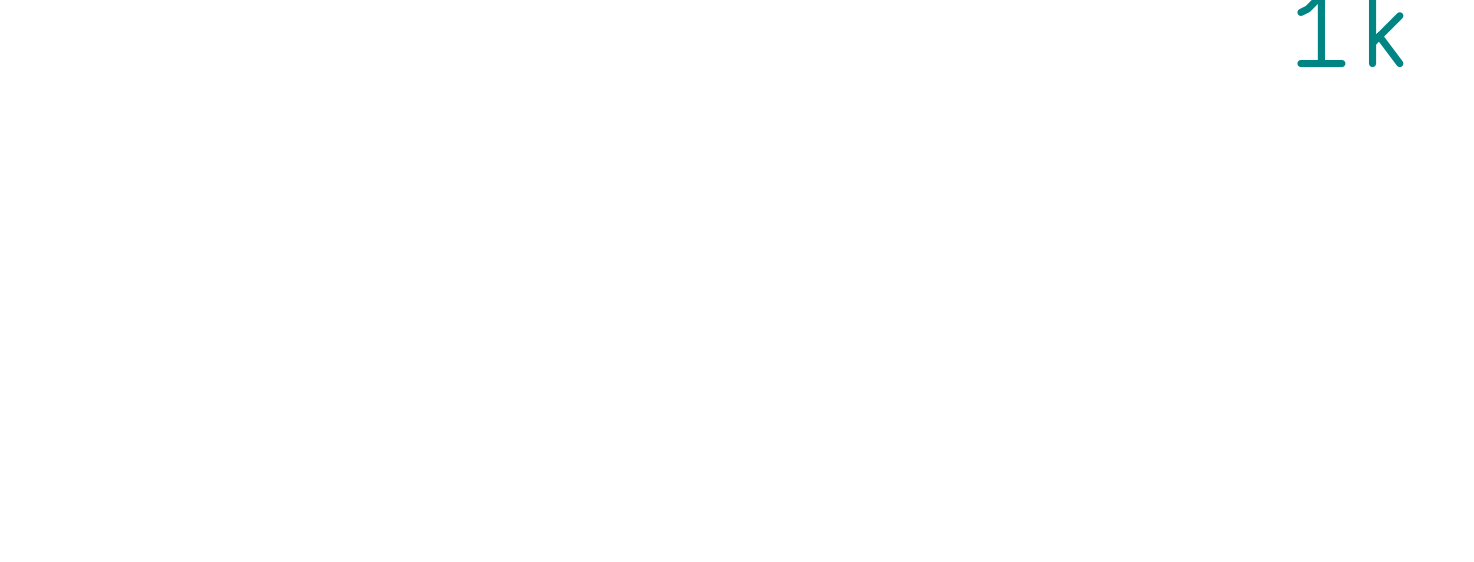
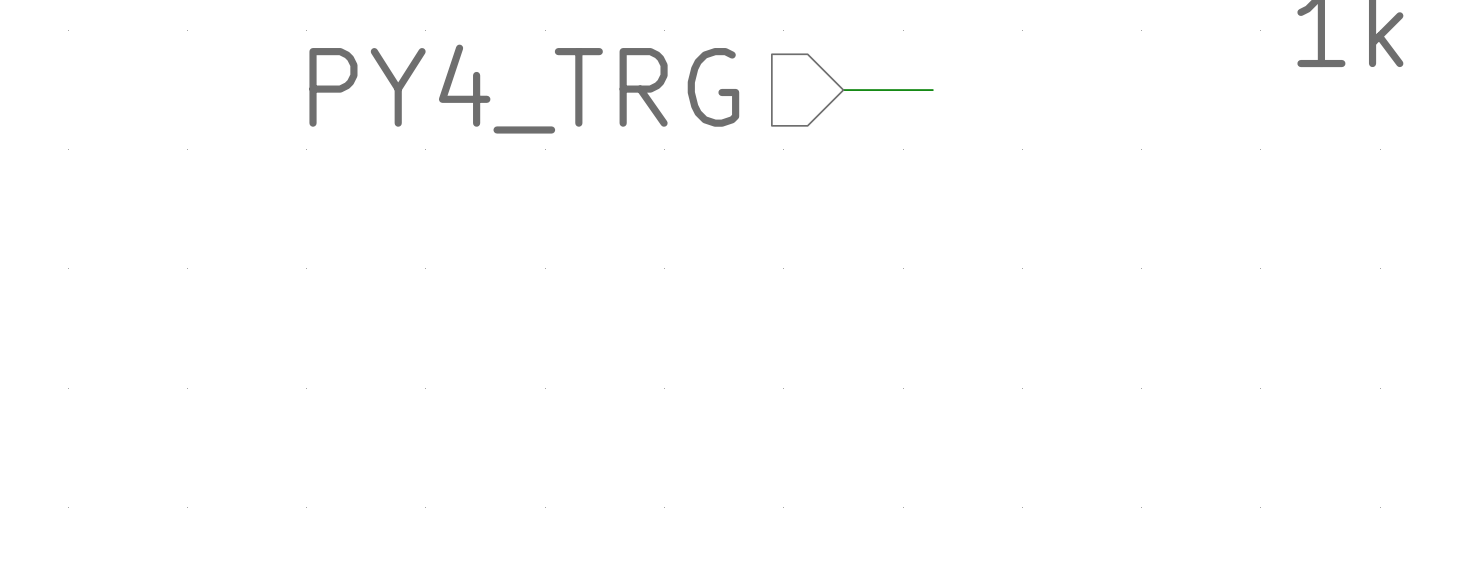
hierarchical label: none -> PY4_TRG (524, 89)
wire: none -> (843, 90) (932, 90)

